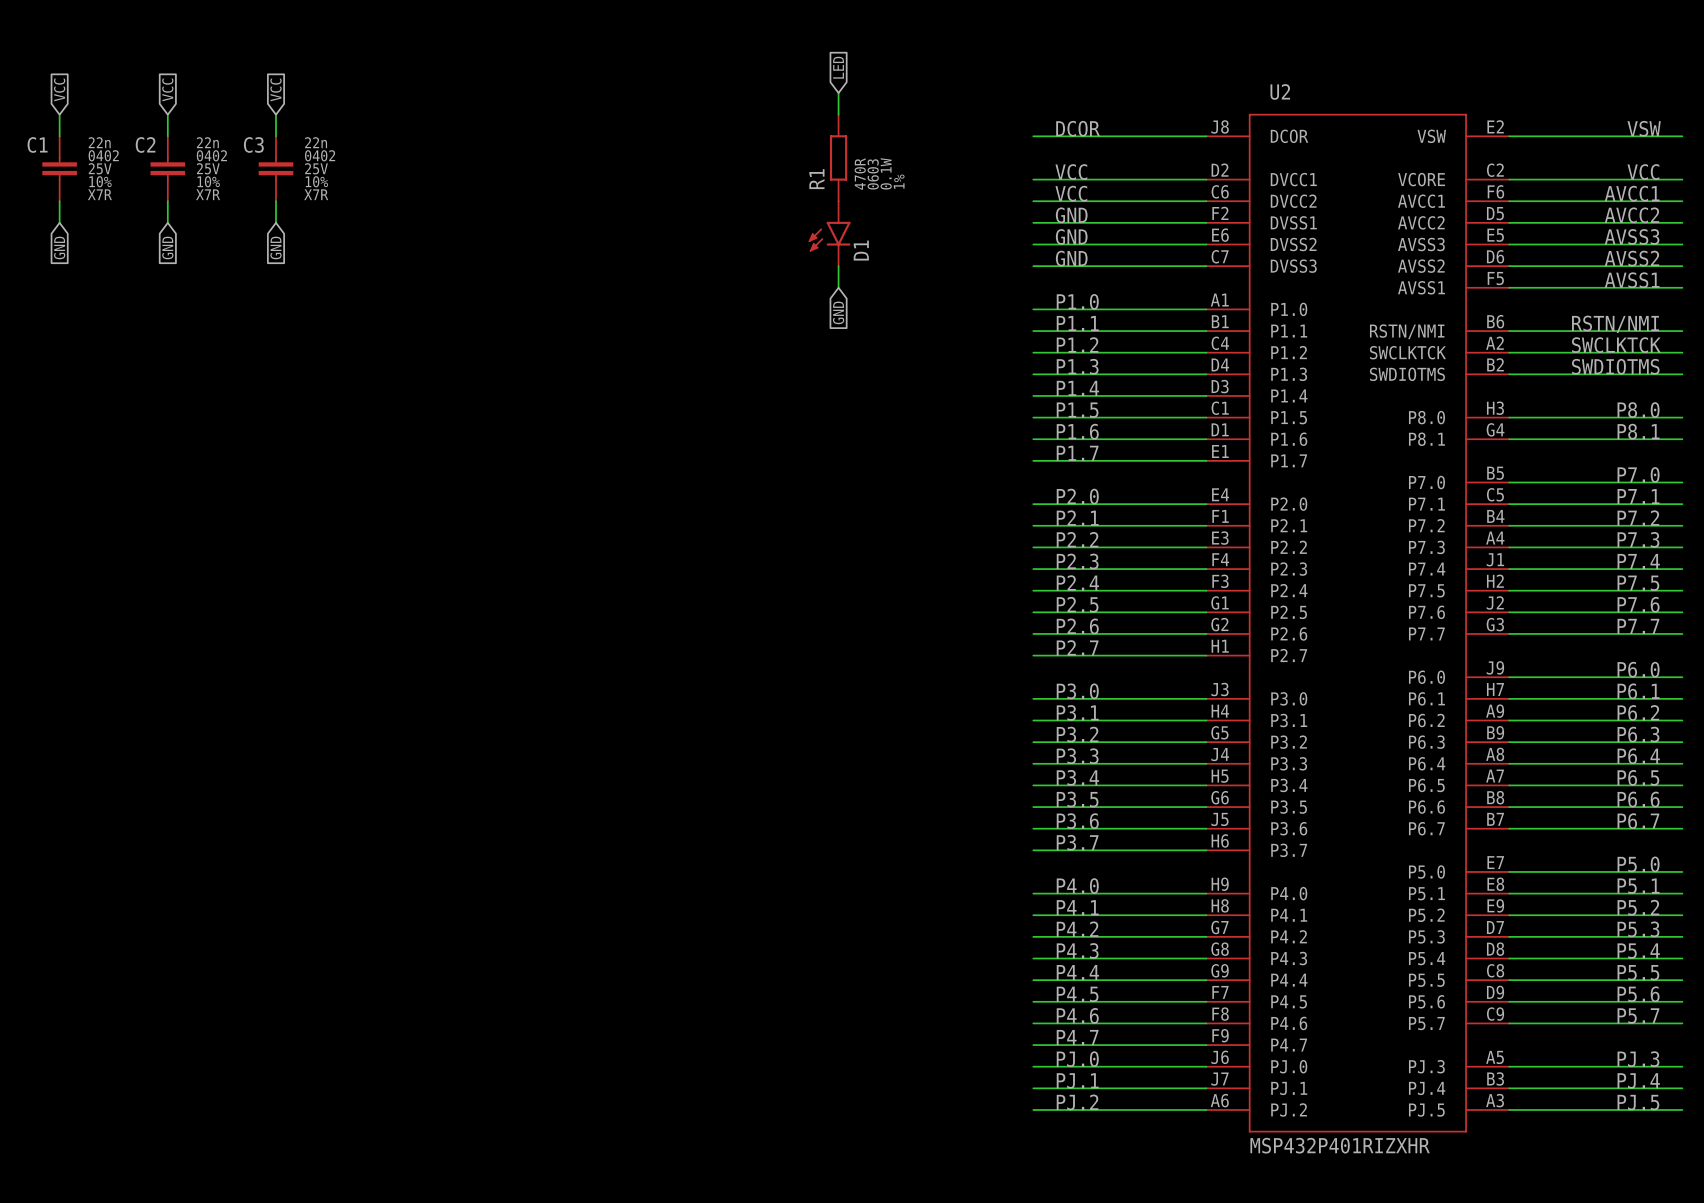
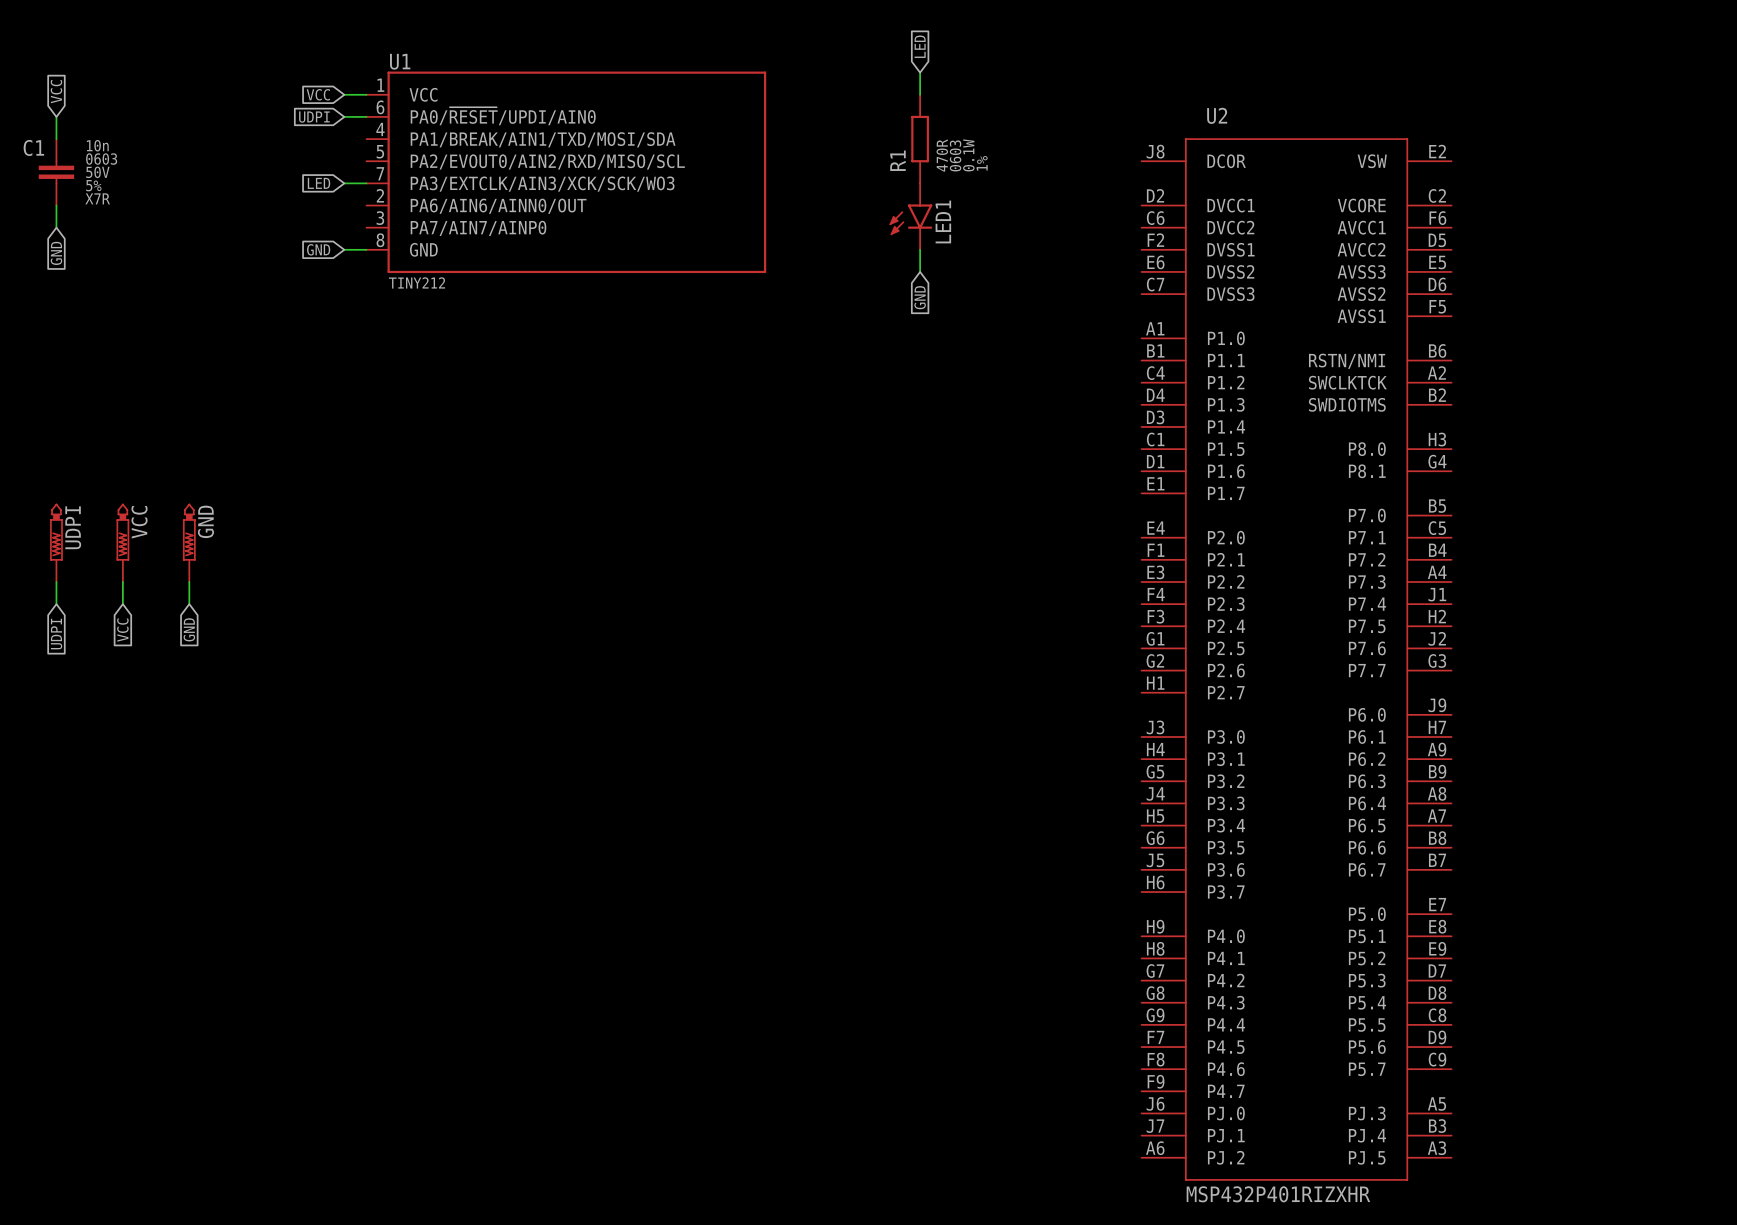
global label position: LED (838, 67) -> LED (920, 46)
global label: VCC (167, 89) -> none
global label rotation: 0° (276, 89) -> 90° counterclockwise (318, 94)
wire: none -> (344, 94) (366, 94)
wire: (838, 93) (838, 114) -> (920, 72) (920, 94)
wire: (167, 114) (167, 136) -> none
wire: (276, 114) (276, 136) -> none
global label: none -> UDPI (314, 117)
wire: none -> (344, 116) (366, 116)
label: DCOR (1078, 128) -> none
label: VSW (1644, 128) -> none
wire: (1033, 136) (1206, 136) -> none
wire: (1509, 136) (1682, 136) -> none
C1 value: 22n (99, 142) -> 10n (97, 145)
C1 text: 0402 (103, 155) -> 0603 (101, 159)
R1 position: (838, 157) -> (920, 139)
C1 text: 25V (100, 168) -> 50V (97, 172)
C2: 22n (167, 168) -> none
C3: 22n (276, 168) -> none
U1: none -> TINY212 (566, 172)
label: VCC (1071, 172) -> none
label: VCC (1643, 172) -> none
global label: none -> LED (319, 183)
wire: none -> (344, 183) (366, 183)
wire: (1033, 179) (1206, 179) -> none
wire: (1509, 179) (1682, 179) -> none
C1 text: 10% (100, 181) -> 5% (93, 185)
label: VCC (1071, 193) -> none
label: AVCC1 (1632, 193) -> none
wire: (167, 201) (167, 222) -> none
wire: (276, 201) (276, 222) -> none
wire: (1033, 201) (1206, 201) -> none
wire: (1509, 201) (1682, 201) -> none
LED1: none -> (910, 216)
label: GND (1071, 215) -> none
label: AVCC2 (1632, 215) -> none
wire: (1033, 222) (1206, 222) -> none
wire: (1509, 222) (1682, 222) -> none
D1: (829, 233) -> none
label: GND (1071, 236) -> none
label: AVSS3 (1632, 236) -> none
wire: none -> (344, 249) (366, 249)
wire: (1033, 244) (1206, 244) -> none
wire: (1509, 244) (1682, 244) -> none
global label: GND (167, 247) -> none
global label rotation: 0° (276, 247) -> 90° clockwise (318, 249)
label: GND (1071, 258) -> none
label: AVSS2 (1632, 258) -> none
wire: (838, 266) (838, 287) -> (920, 249) (920, 271)
wire: (1033, 266) (1206, 266) -> none
wire: (1509, 266) (1682, 266) -> none
label: AVSS1 (1632, 280) -> none
wire: (1509, 287) (1682, 287) -> none
label: P1.0 (1077, 301) -> none
wire: (1033, 309) (1206, 309) -> none
global label position: GND (838, 312) -> GND (920, 297)
label: P1.1 (1077, 323) -> none
label: RSTN/NMI (1615, 324) -> none
wire: (1033, 331) (1206, 331) -> none
wire: (1509, 331) (1682, 331) -> none
label: P1.2 (1077, 344) -> none
label: SWCLKTCK (1616, 345) -> none
wire: (1033, 352) (1206, 352) -> none
wire: (1509, 352) (1682, 352) -> none
label: P1.3 (1077, 366) -> none
label: SWDIOTMS (1615, 366) -> none
wire: (1033, 374) (1206, 374) -> none
wire: (1509, 374) (1682, 374) -> none
label: P1.4 (1077, 388) -> none
wire: (1033, 395) (1206, 395) -> none
label: P1.5 (1077, 410) -> none
label: P8.0 (1638, 410) -> none
wire: (1033, 417) (1206, 417) -> none
wire: (1509, 417) (1682, 417) -> none
label: P1.6 (1077, 431) -> none
label: P8.1 (1638, 431) -> none
wire: (1033, 439) (1206, 439) -> none
wire: (1509, 439) (1682, 439) -> none
label: P1.7 (1077, 453) -> none
wire: (1033, 460) (1206, 460) -> none
label: P7.0 (1638, 474) -> none
wire: (1509, 482) (1682, 482) -> none
label: P2.0 (1077, 496) -> none
label: P7.1 (1638, 496) -> none
wire: (1033, 504) (1206, 504) -> none
wire: (1509, 504) (1682, 504) -> none
label: P2.1 (1077, 518) -> none
label: P7.2 (1638, 518) -> none
wire: (1033, 525) (1206, 525) -> none
wire: (1509, 525) (1682, 525) -> none
UDPI: none -> (56, 542)
VCC: none -> (122, 542)
GND: none -> (189, 542)
label: P2.2 (1077, 539) -> none
label: P7.3 (1638, 539) -> none
wire: (1033, 547) (1206, 547) -> none
wire: (1509, 547) (1682, 547) -> none
label: P2.3 (1077, 561) -> none
label: P7.4 (1638, 561) -> none
wire: none -> (56, 581) (56, 604)
wire: none -> (122, 581) (122, 604)
wire: none -> (189, 581) (189, 604)
wire: (1033, 569) (1206, 569) -> none
wire: (1509, 569) (1682, 569) -> none
label: P2.4 (1077, 582) -> none
label: P7.5 (1638, 583) -> none
wire: (1033, 590) (1206, 590) -> none
wire: (1509, 590) (1682, 590) -> none
label: P2.5 (1077, 604) -> none
label: P7.6 (1638, 604) -> none
wire: (1033, 612) (1206, 612) -> none
wire: (1509, 612) (1682, 612) -> none
global label: none -> GND (189, 629)
global label: none -> VCC (122, 630)
global label: none -> UDPI (56, 634)
U2 position: (1357, 623) -> (1296, 659)
label: P2.6 (1077, 626) -> none
label: P7.7 (1638, 626) -> none
wire: (1033, 633) (1206, 633) -> none
wire: (1509, 633) (1682, 633) -> none
label: P2.7 (1077, 647) -> none
wire: (1033, 655) (1206, 655) -> none
label: P6.0 (1638, 669) -> none
wire: (1509, 677) (1682, 677) -> none
label: P3.0 (1077, 691) -> none
label: P6.1 (1638, 691) -> none
wire: (1033, 698) (1206, 698) -> none
wire: (1509, 698) (1682, 698) -> none
label: P3.1 (1077, 712) -> none
label: P6.2 (1638, 712) -> none
wire: (1033, 720) (1206, 720) -> none
wire: (1509, 720) (1682, 720) -> none
label: P3.2 (1077, 734) -> none
label: P6.3 (1638, 734) -> none
wire: (1033, 742) (1206, 742) -> none
wire: (1509, 742) (1682, 742) -> none
label: P3.3 (1077, 756) -> none
label: P6.4 (1638, 756) -> none
wire: (1033, 763) (1206, 763) -> none
wire: (1509, 763) (1682, 763) -> none
label: P3.4 (1077, 777) -> none
label: P6.5 (1638, 777) -> none
wire: (1033, 785) (1206, 785) -> none
wire: (1509, 785) (1682, 785) -> none
label: P3.5 (1077, 799) -> none
label: P6.6 (1638, 799) -> none
wire: (1033, 807) (1206, 807) -> none
wire: (1509, 807) (1682, 807) -> none
label: P3.6 (1077, 821) -> none
label: P6.7 (1638, 821) -> none
wire: (1033, 828) (1206, 828) -> none
wire: (1509, 828) (1682, 828) -> none
label: P3.7 (1077, 842) -> none
wire: (1033, 850) (1206, 850) -> none
label: P5.0 (1638, 864) -> none
wire: (1509, 871) (1682, 871) -> none
label: P4.0 (1077, 886) -> none
label: P5.1 (1638, 886) -> none
wire: (1033, 893) (1206, 893) -> none
wire: (1509, 893) (1682, 893) -> none
label: P4.1 (1077, 907) -> none
label: P5.2 (1638, 907) -> none
wire: (1033, 915) (1206, 915) -> none
wire: (1509, 915) (1682, 915) -> none
label: P4.2 (1077, 929) -> none
label: P5.3 (1638, 929) -> none
wire: (1033, 936) (1206, 936) -> none
wire: (1509, 936) (1682, 936) -> none
label: P4.3 (1077, 950) -> none
label: P5.4 (1638, 951) -> none
wire: (1033, 958) (1206, 958) -> none
wire: (1509, 958) (1682, 958) -> none
label: P4.4 (1077, 972) -> none
label: P5.5 (1638, 972) -> none
wire: (1033, 980) (1206, 980) -> none
wire: (1509, 980) (1682, 980) -> none
label: P4.5 (1077, 994) -> none
label: P5.6 (1638, 994) -> none
wire: (1033, 1001) (1206, 1001) -> none
wire: (1509, 1001) (1682, 1001) -> none
label: P4.6 (1077, 1015) -> none
label: P5.7 (1638, 1016) -> none
wire: (1033, 1023) (1206, 1023) -> none
wire: (1509, 1023) (1682, 1023) -> none
label: P4.7 (1077, 1037) -> none
wire: (1033, 1045) (1206, 1045) -> none
label: PJ.0 (1077, 1059) -> none
label: PJ.3 (1638, 1059) -> none
wire: (1033, 1066) (1206, 1066) -> none
wire: (1509, 1066) (1682, 1066) -> none
label: PJ.1 (1077, 1080) -> none
label: PJ.4 (1638, 1080) -> none
wire: (1033, 1088) (1206, 1088) -> none
wire: (1509, 1088) (1682, 1088) -> none
label: PJ.2 (1077, 1102) -> none
label: PJ.5 (1638, 1102) -> none
wire: (1033, 1109) (1206, 1109) -> none
wire: (1509, 1109) (1682, 1109) -> none

